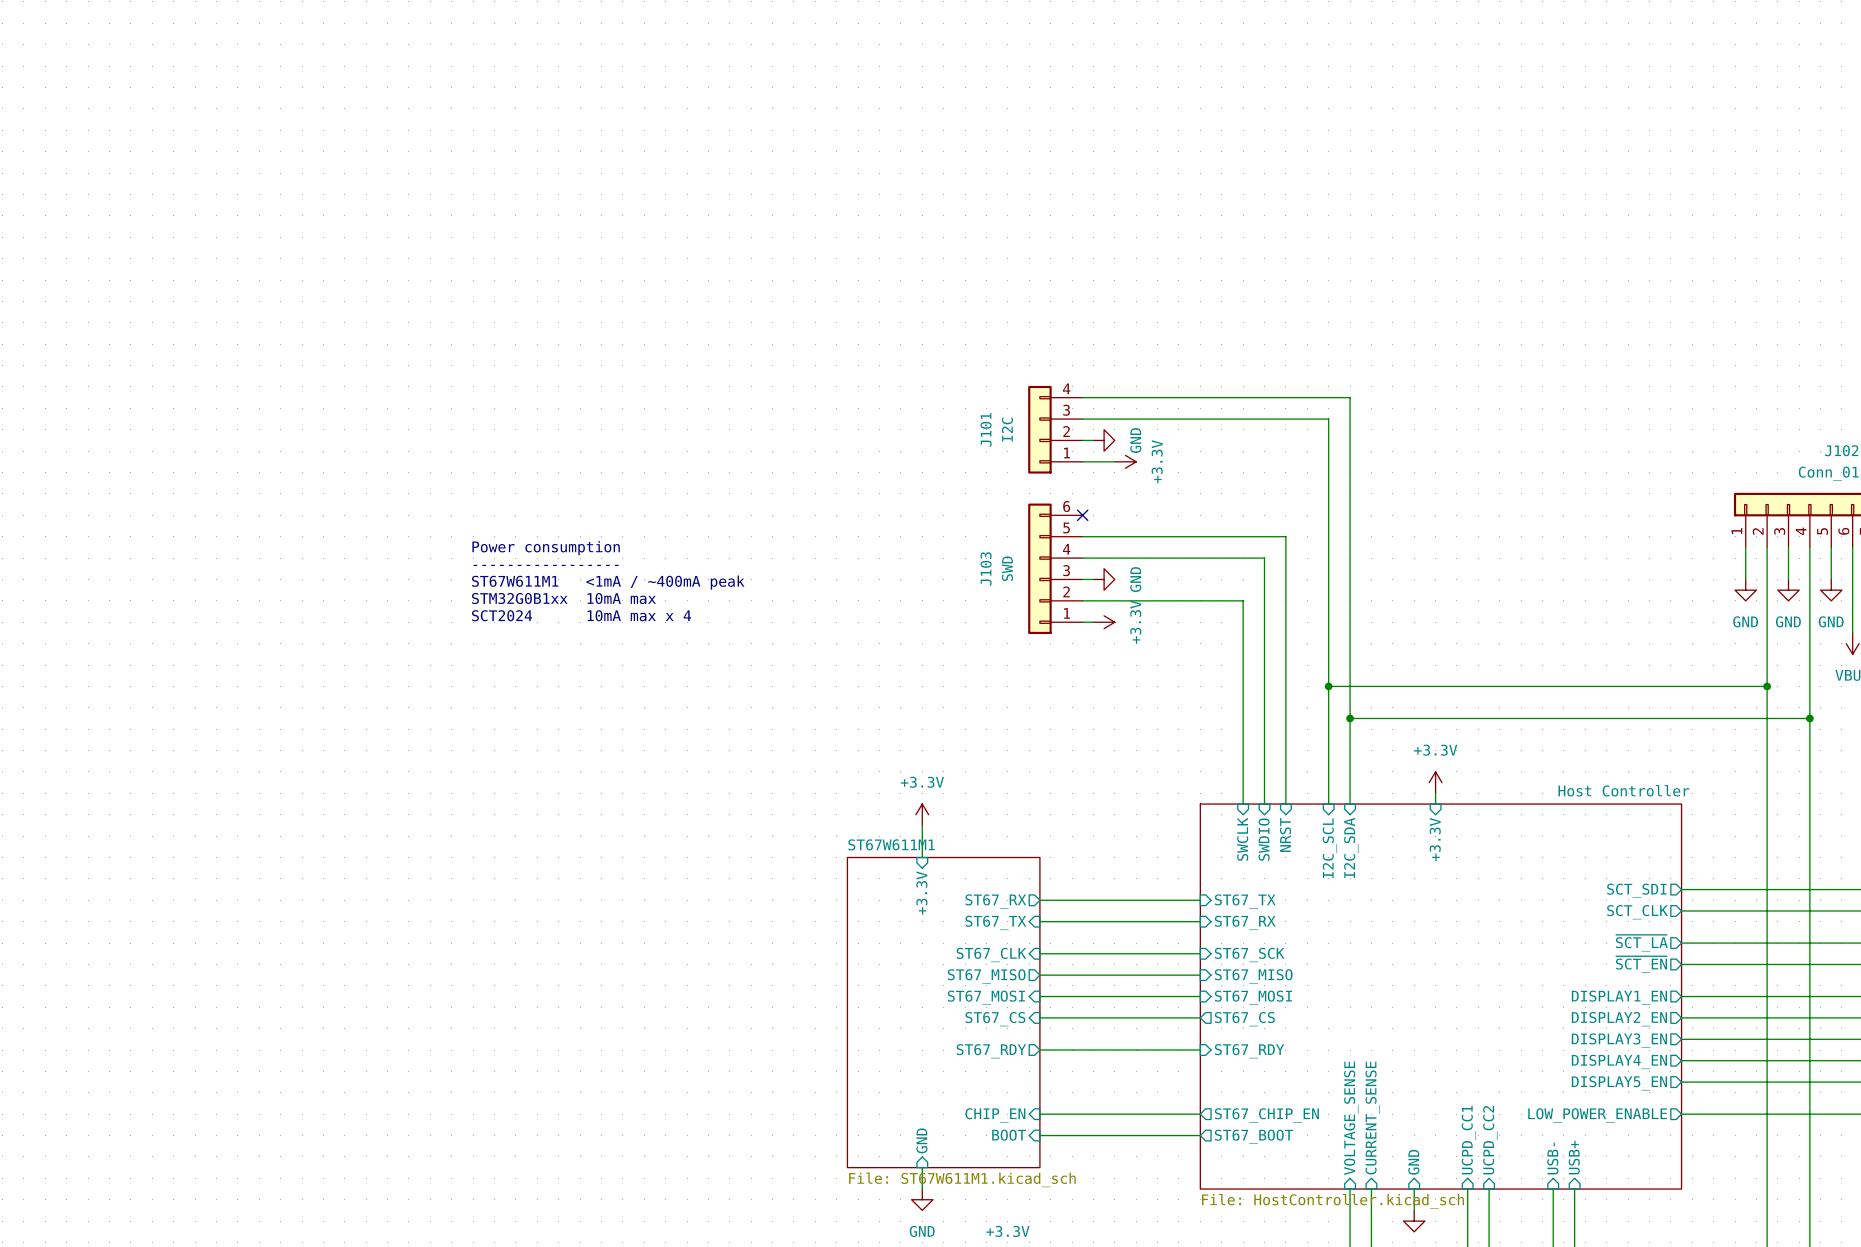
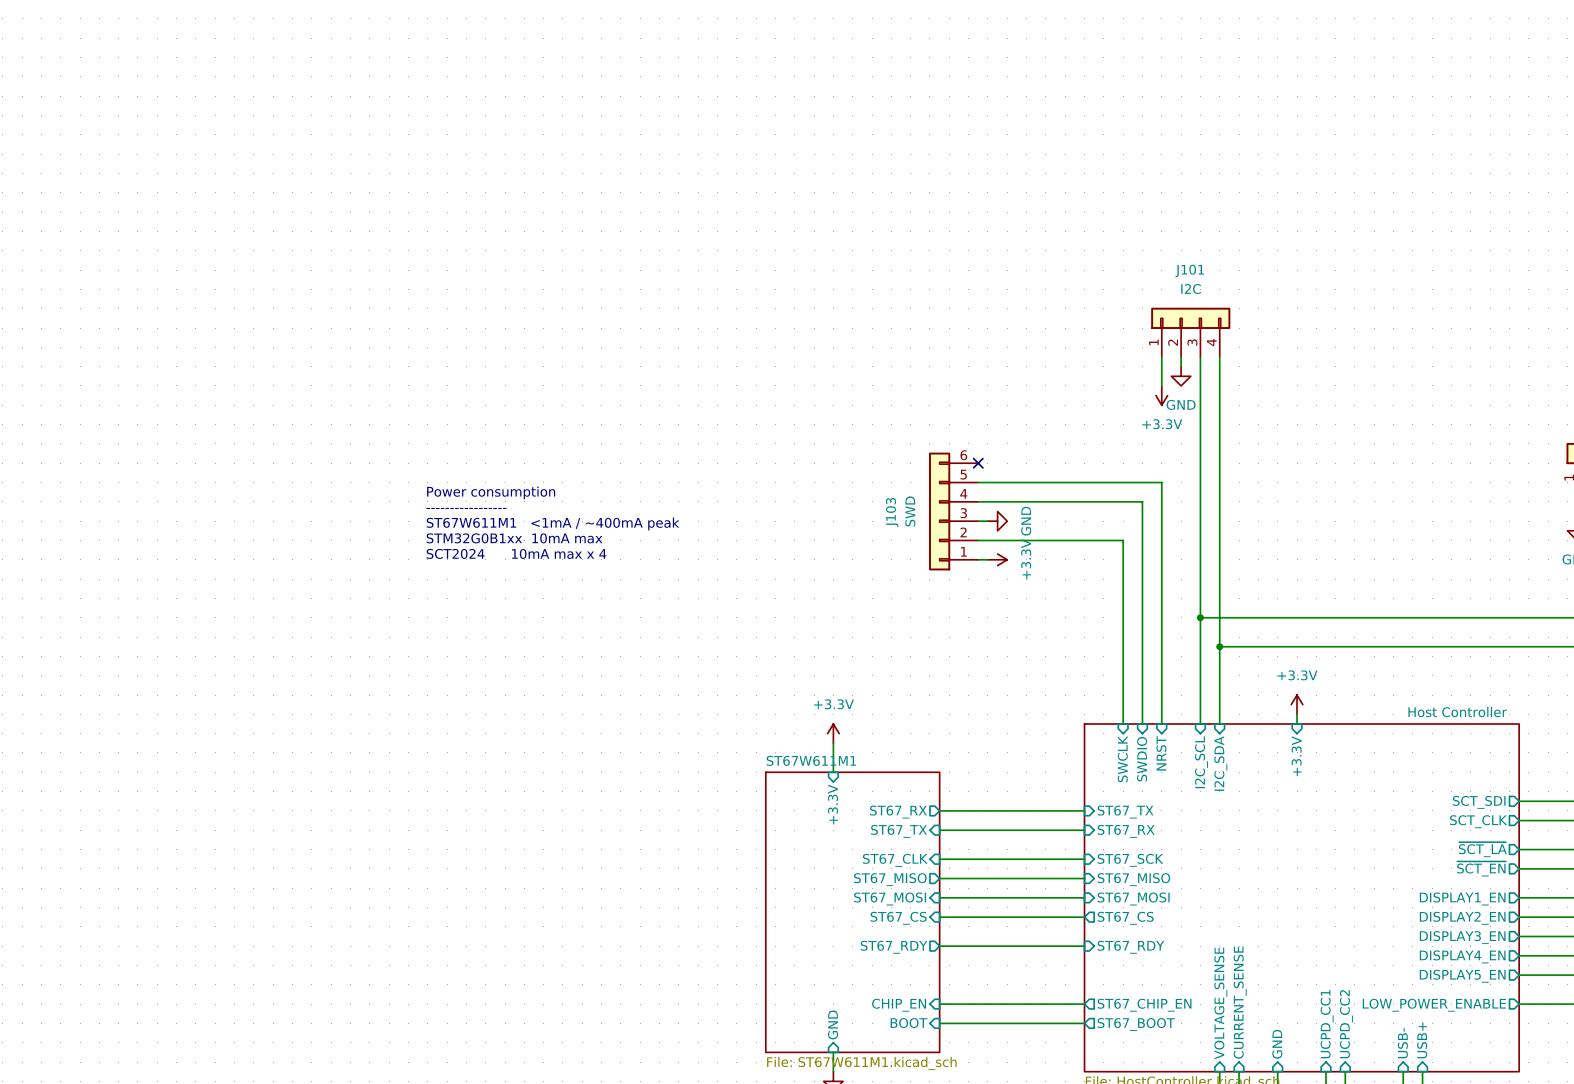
wire: (1082, 397) (1350, 397) -> none
wire: none -> (1161, 356) (1161, 385)
wire: none -> (1181, 356) (1181, 366)
wire: (1082, 419) (1328, 419) -> (1200, 356) (1200, 376)
J101 rotation: 0° (1039, 429) -> 90° clockwise (1190, 318)
J101 position: (1055, 429) -> (1190, 332)
wire: (1082, 440) (1093, 440) -> none
power symbol rotation: 0° (1104, 440) -> 90° clockwise (1181, 376)
power symbol position: GND (1104, 440) -> GND (1181, 376)
wire: (1082, 461) (1114, 461) -> none
power symbol rotation: 0° (1125, 461) -> 90° clockwise (1161, 395)
power symbol position: +3.3V (1125, 461) -> +3.3V (1161, 395)

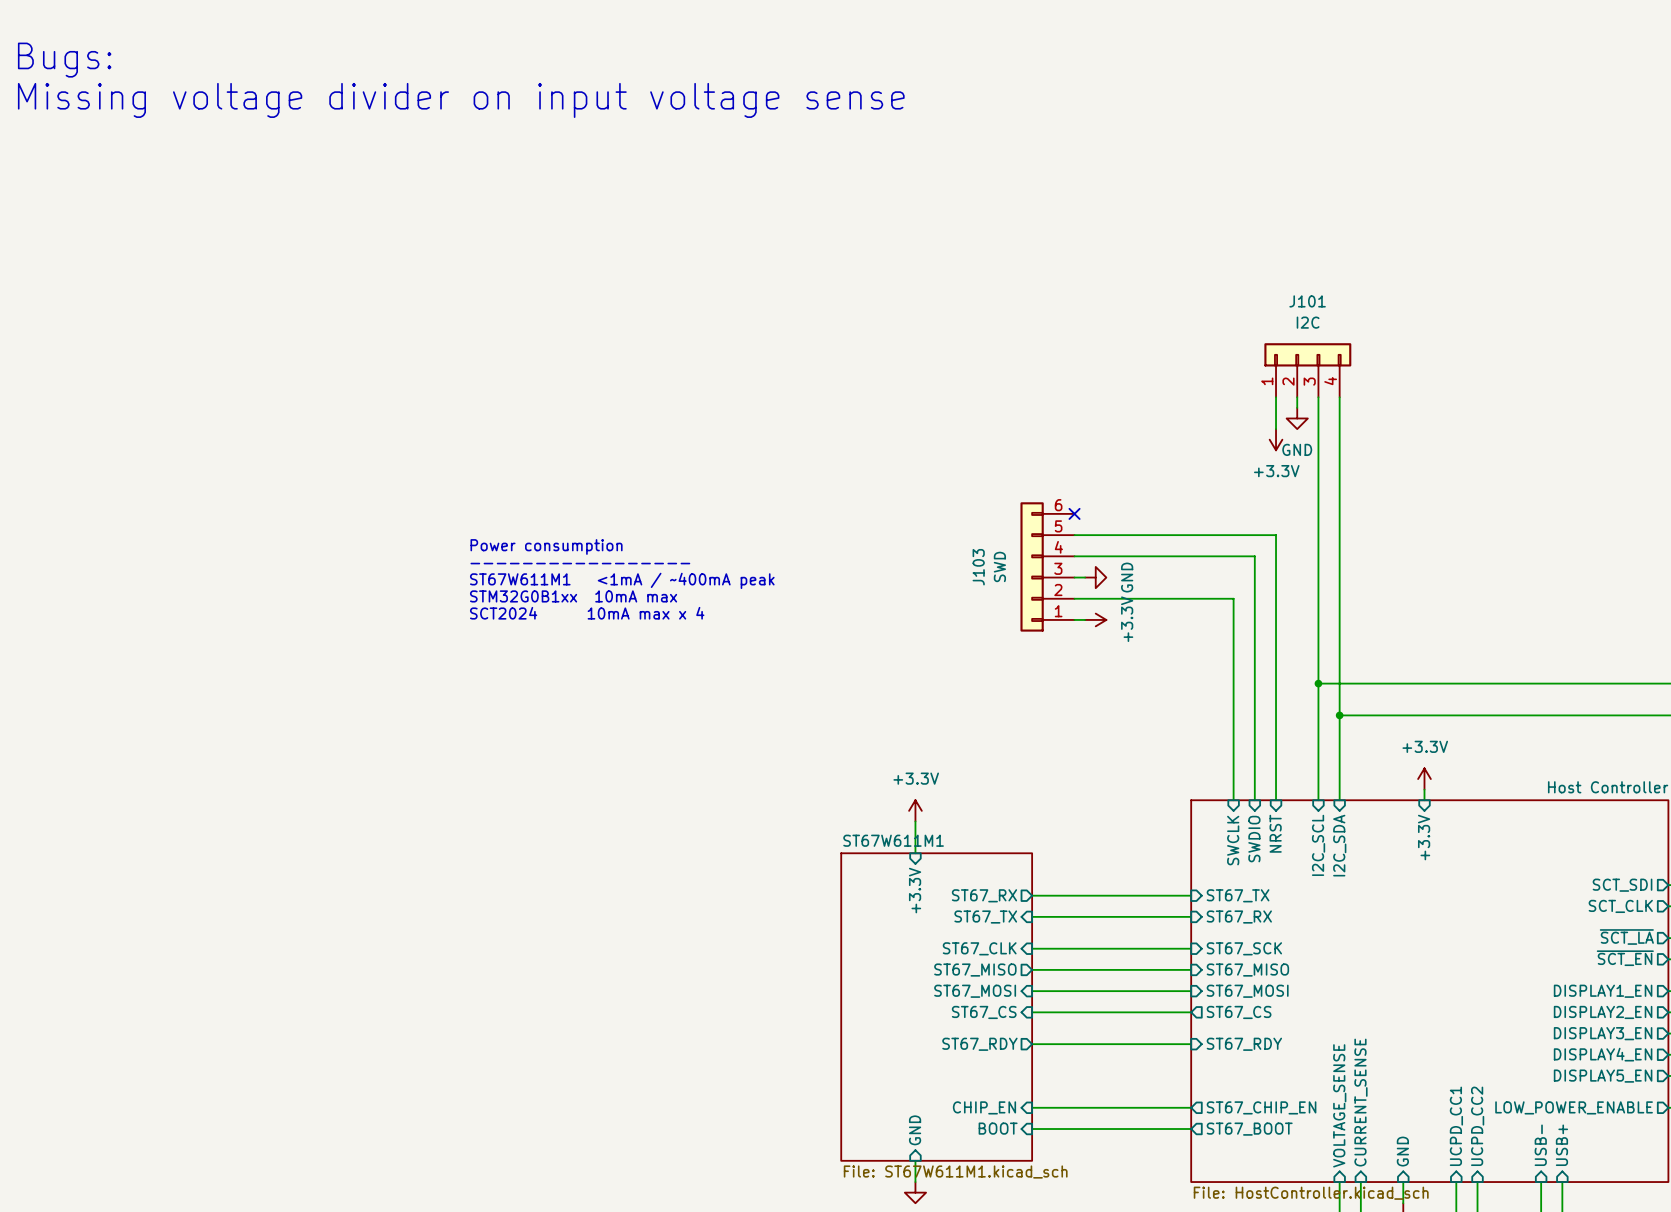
text: none -> Bugs: (64, 60)
text: none -> Missing voltage divider on input voltage sense (461, 100)

